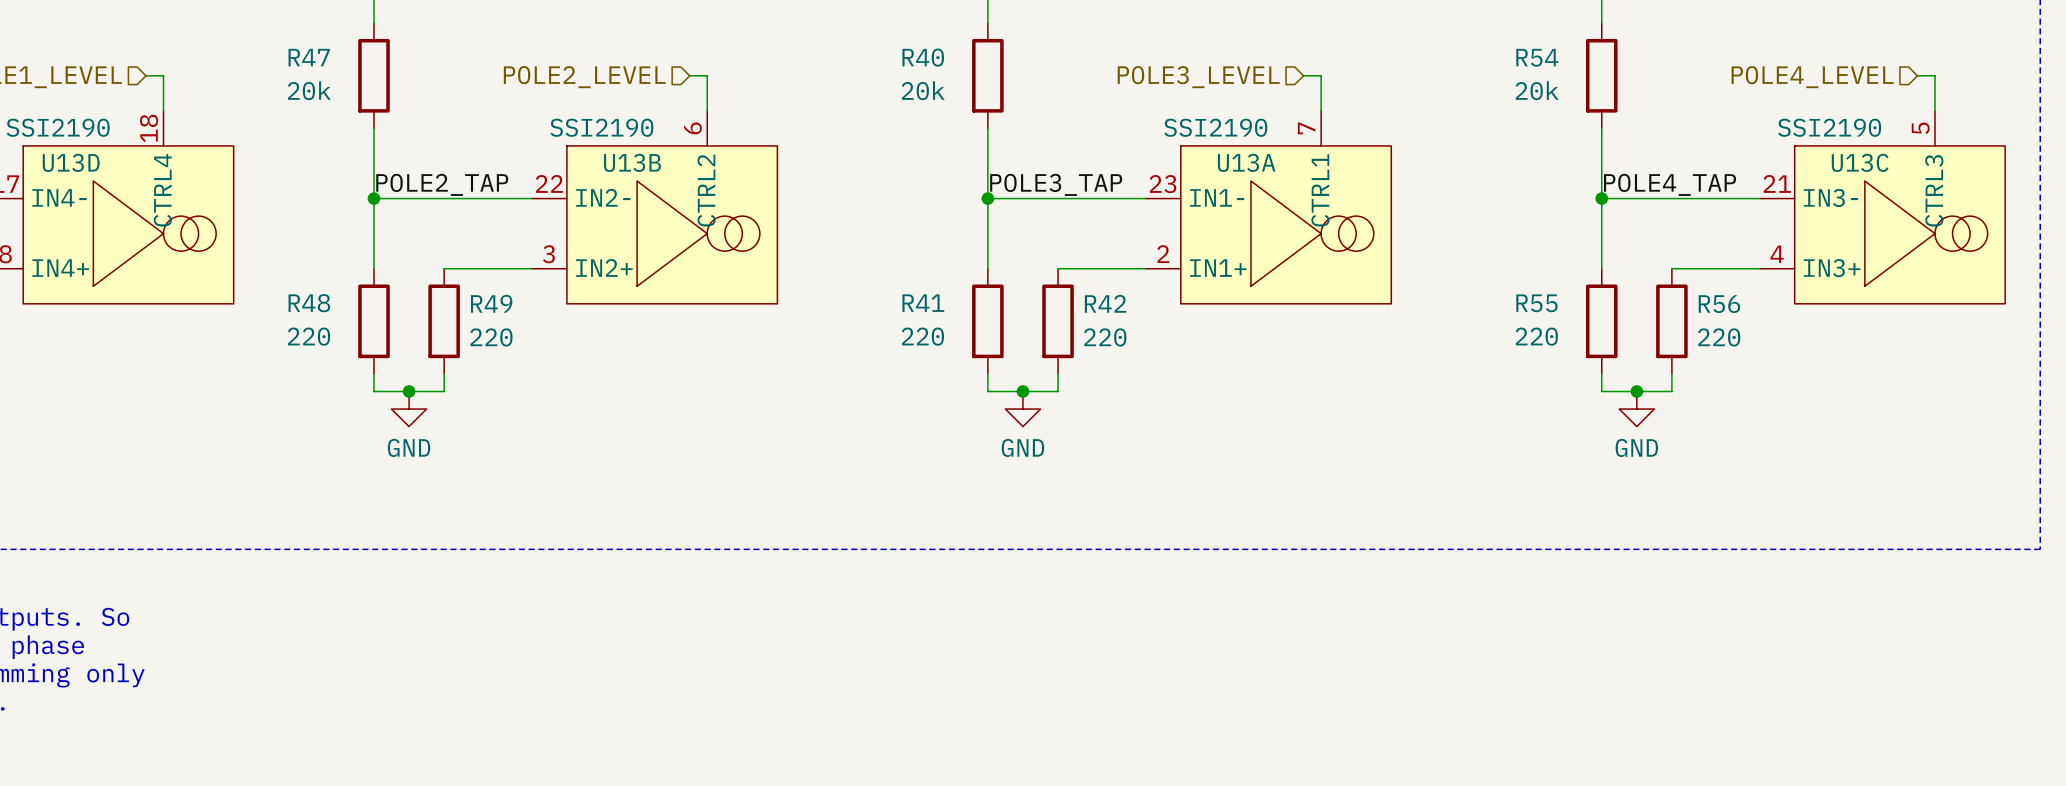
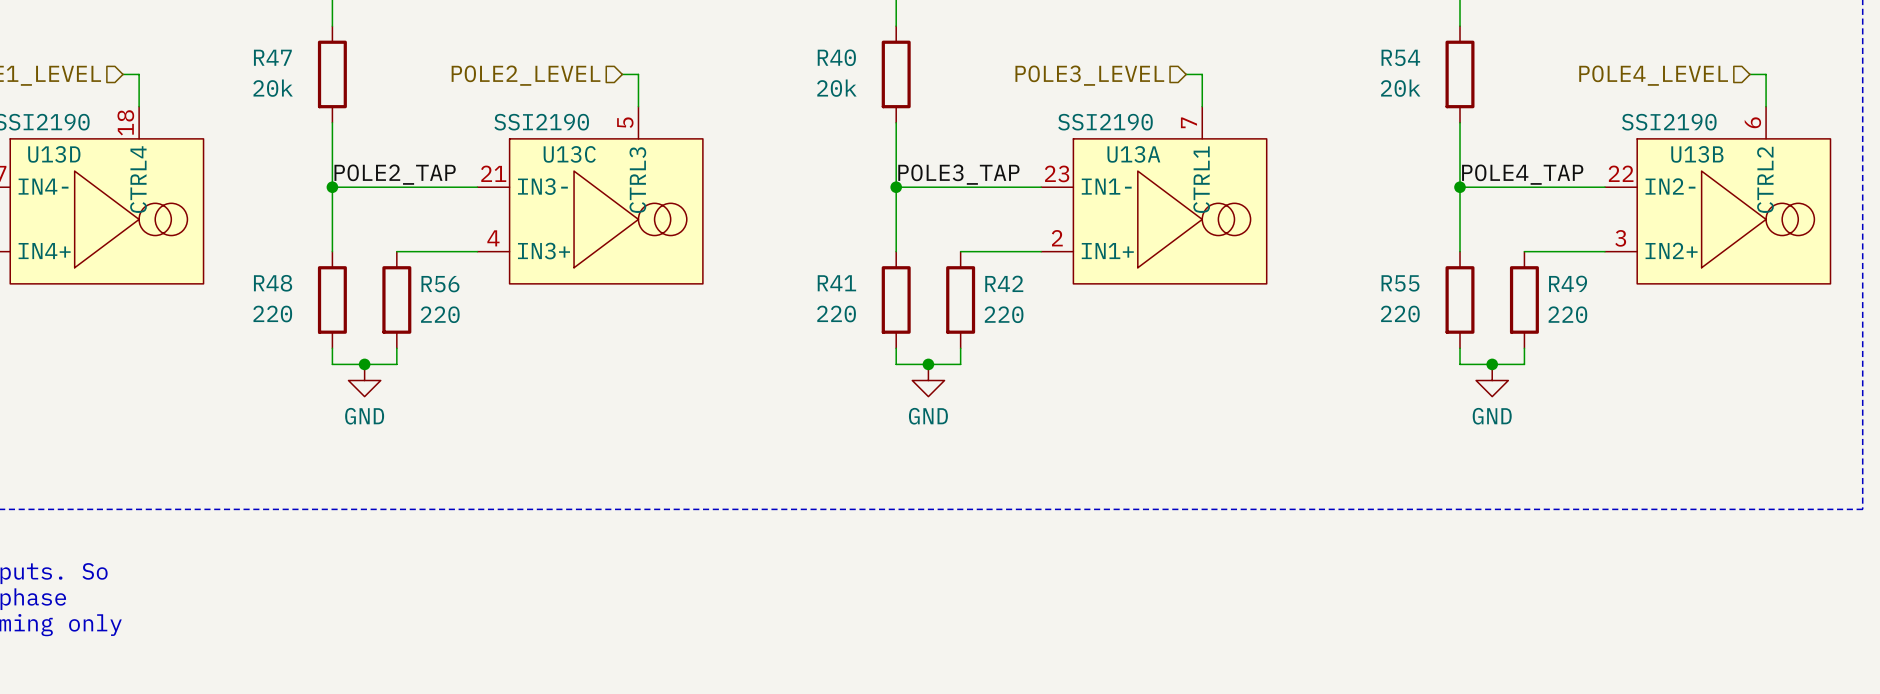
U13B position: (654, 207) -> (1717, 195)
U13C position: (1882, 207) -> (590, 195)
R49 name: R49 (491, 303) -> R56 (440, 284)
R56 name: R56 (1719, 304) -> R49 (1568, 283)

